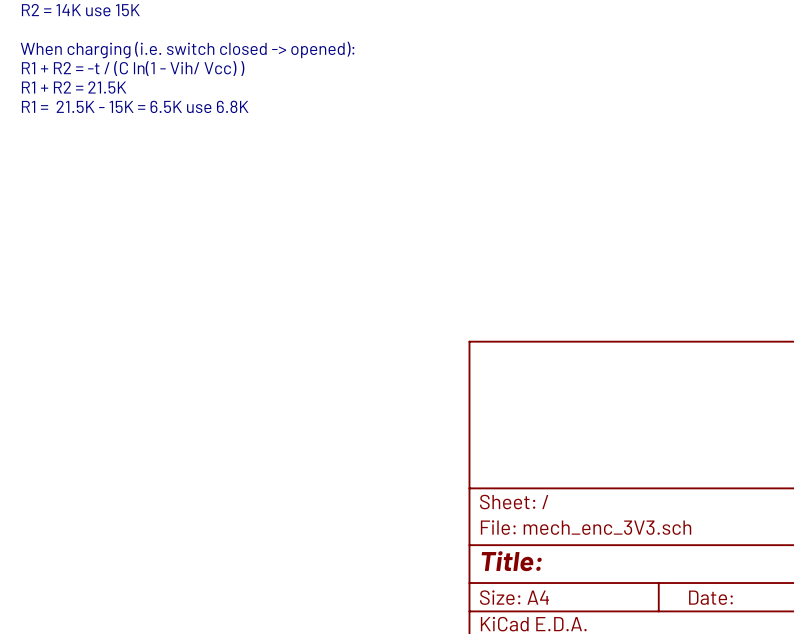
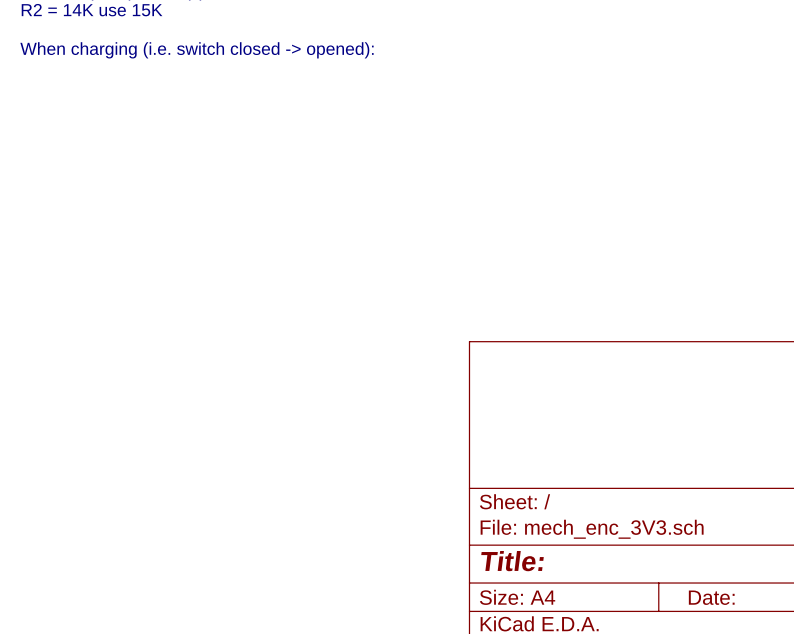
text: R1 + R2 = -t / (C ln(1 - Vih/ Vcc) ) (133, 68) -> none
text: R1 + R2 = 21.5K (74, 87) -> none
text: R1 = 21.5K - 15K = 6.5K use 6.8K (135, 106) -> none

